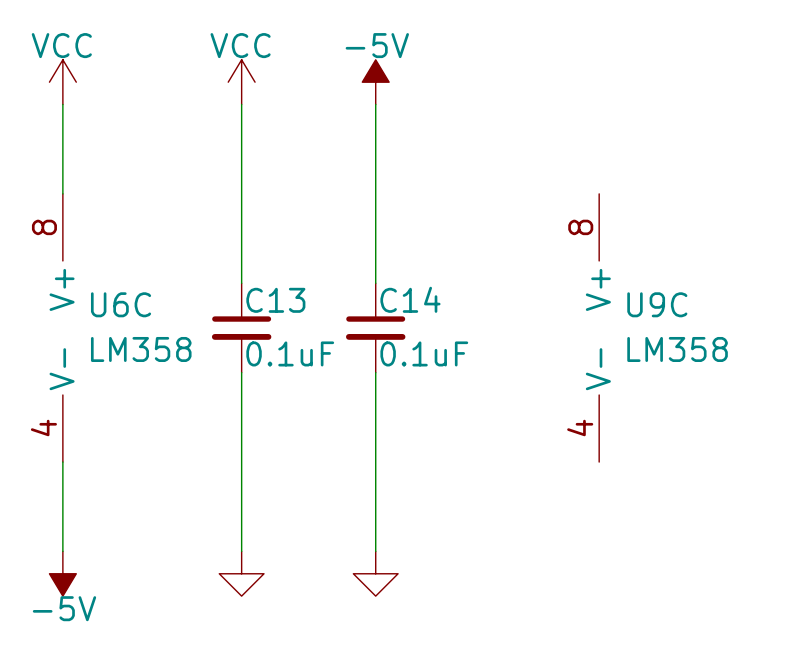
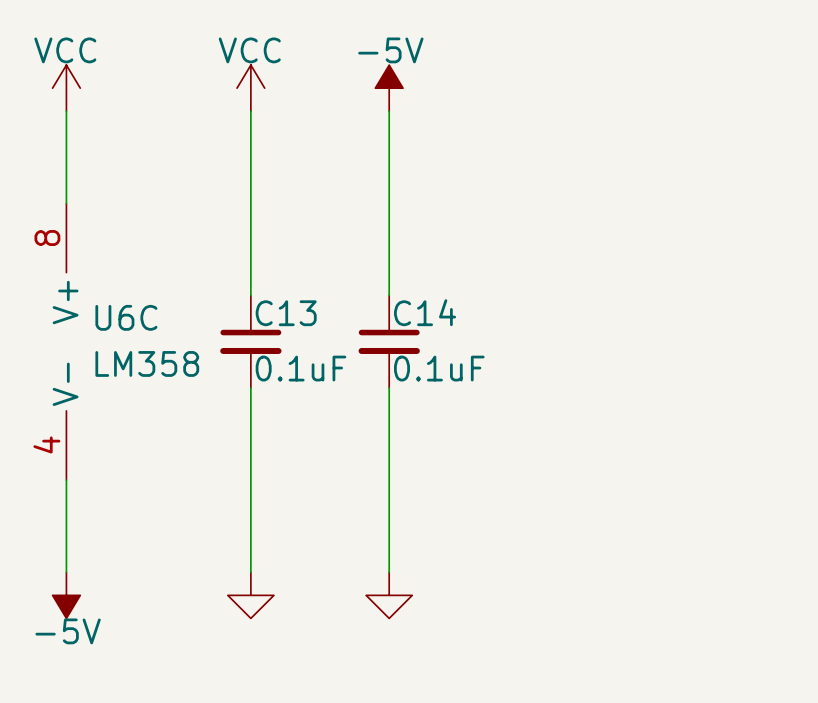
U9C: LM358 (599, 327) -> none

